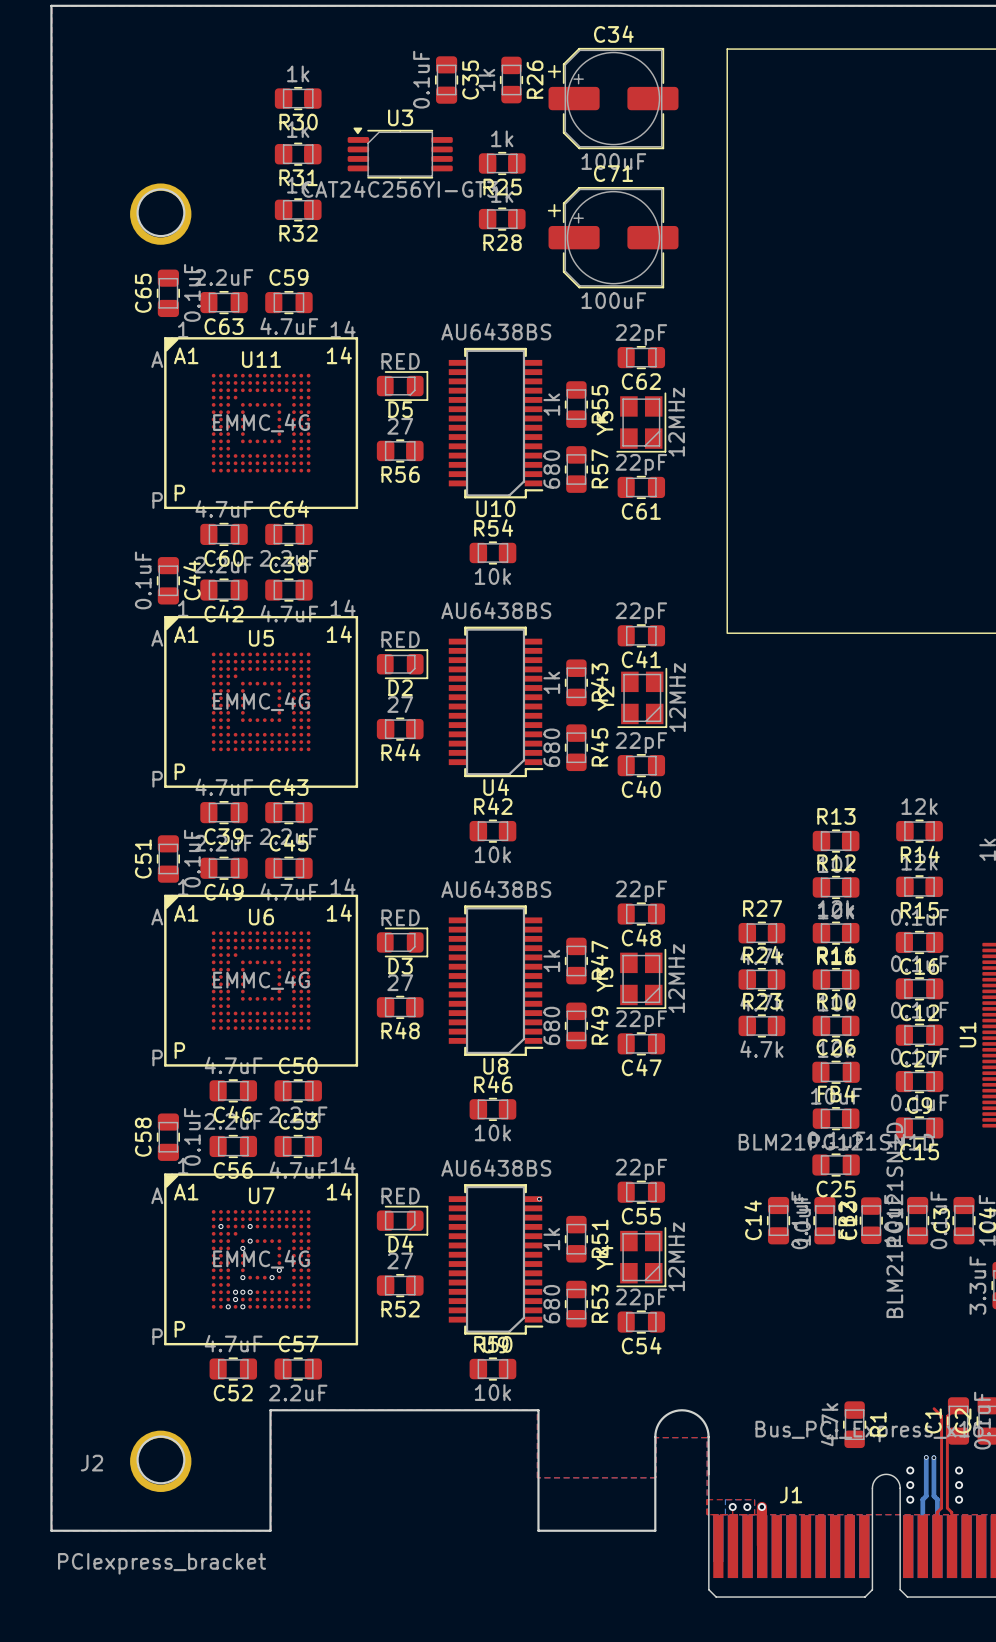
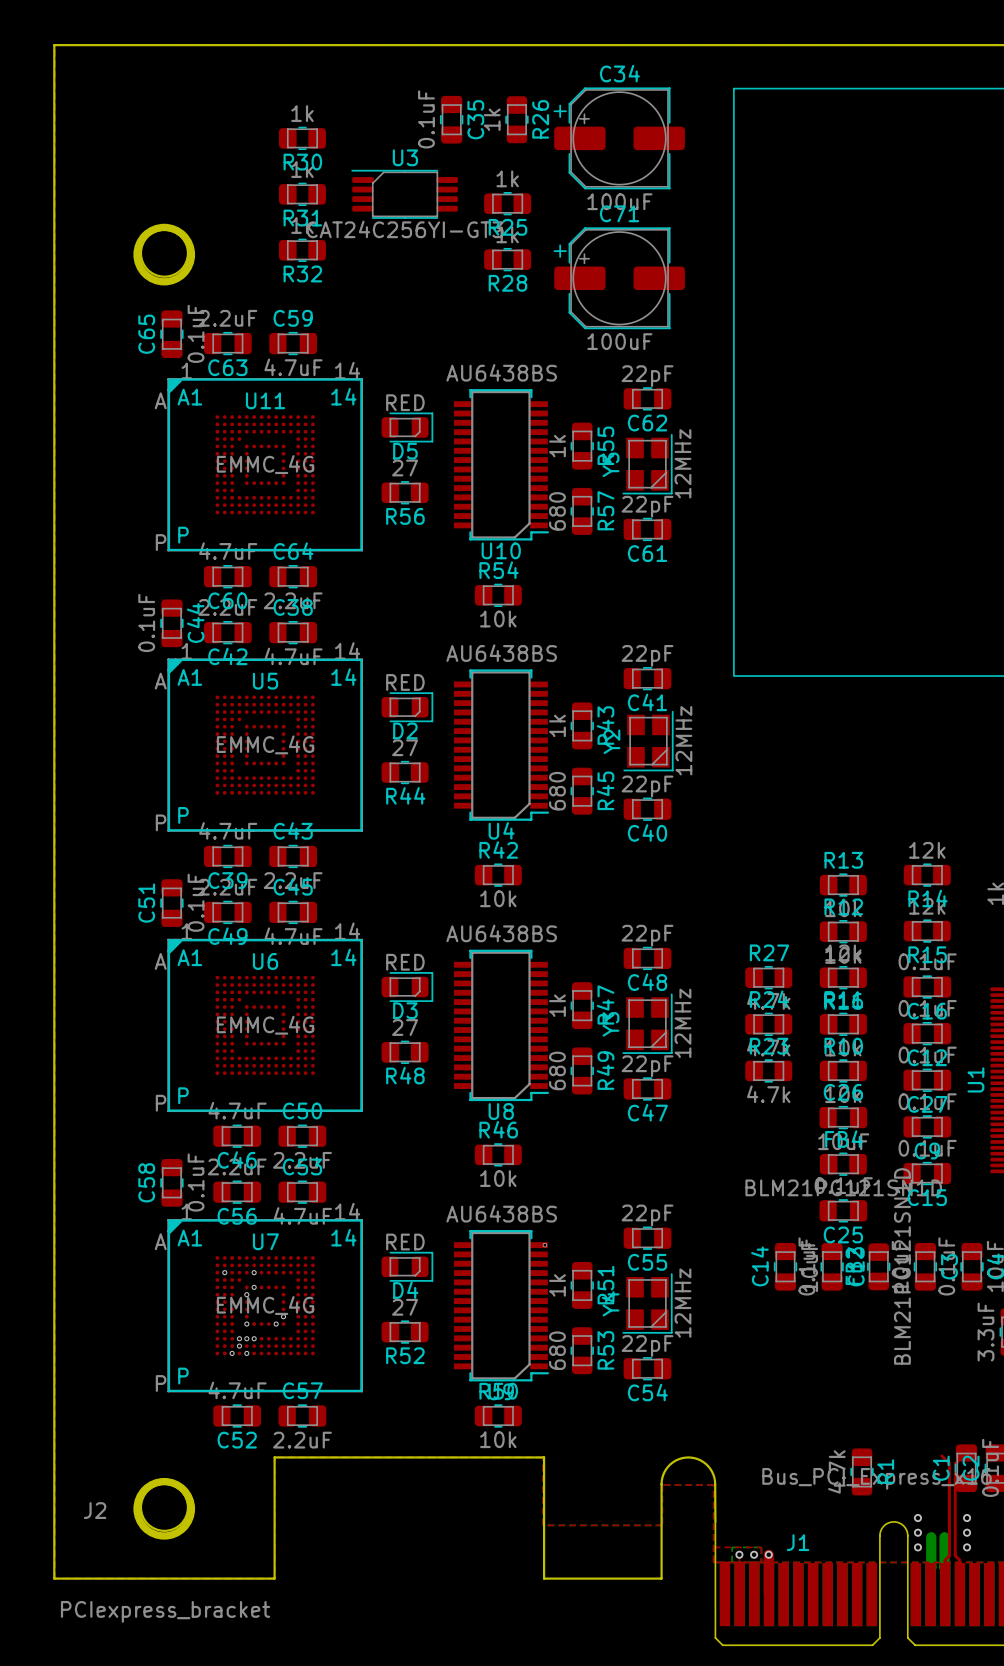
U3 footprint: [347, 127, 453, 179] -> [351, 169, 458, 219]
bottom track: (926, 1457) (926, 1496) (922, 1499) (922, 1520) -> (931, 1537) (930, 1568)
via: (926, 1457) -> none
bottom track: (933, 1457) (933, 1496) (937, 1499) (937, 1520) -> (944, 1537) (945, 1568)
via: (933, 1457) -> none

